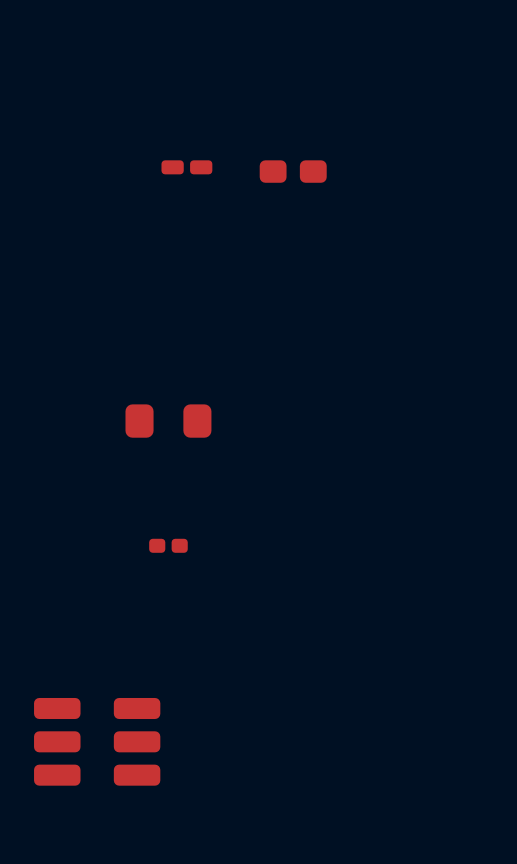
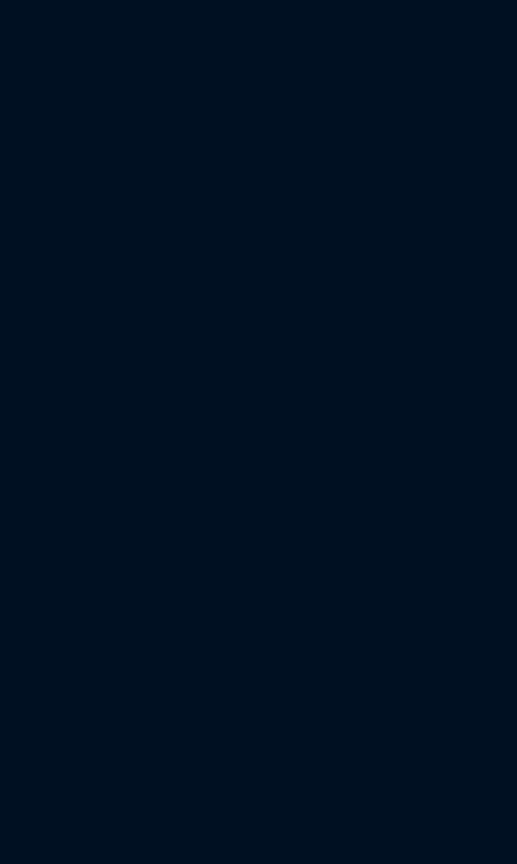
part: (186, 167) -> none
part: (293, 171) -> none
part: (168, 421) -> none
part: (168, 545) -> none
part: (97, 741) -> none

